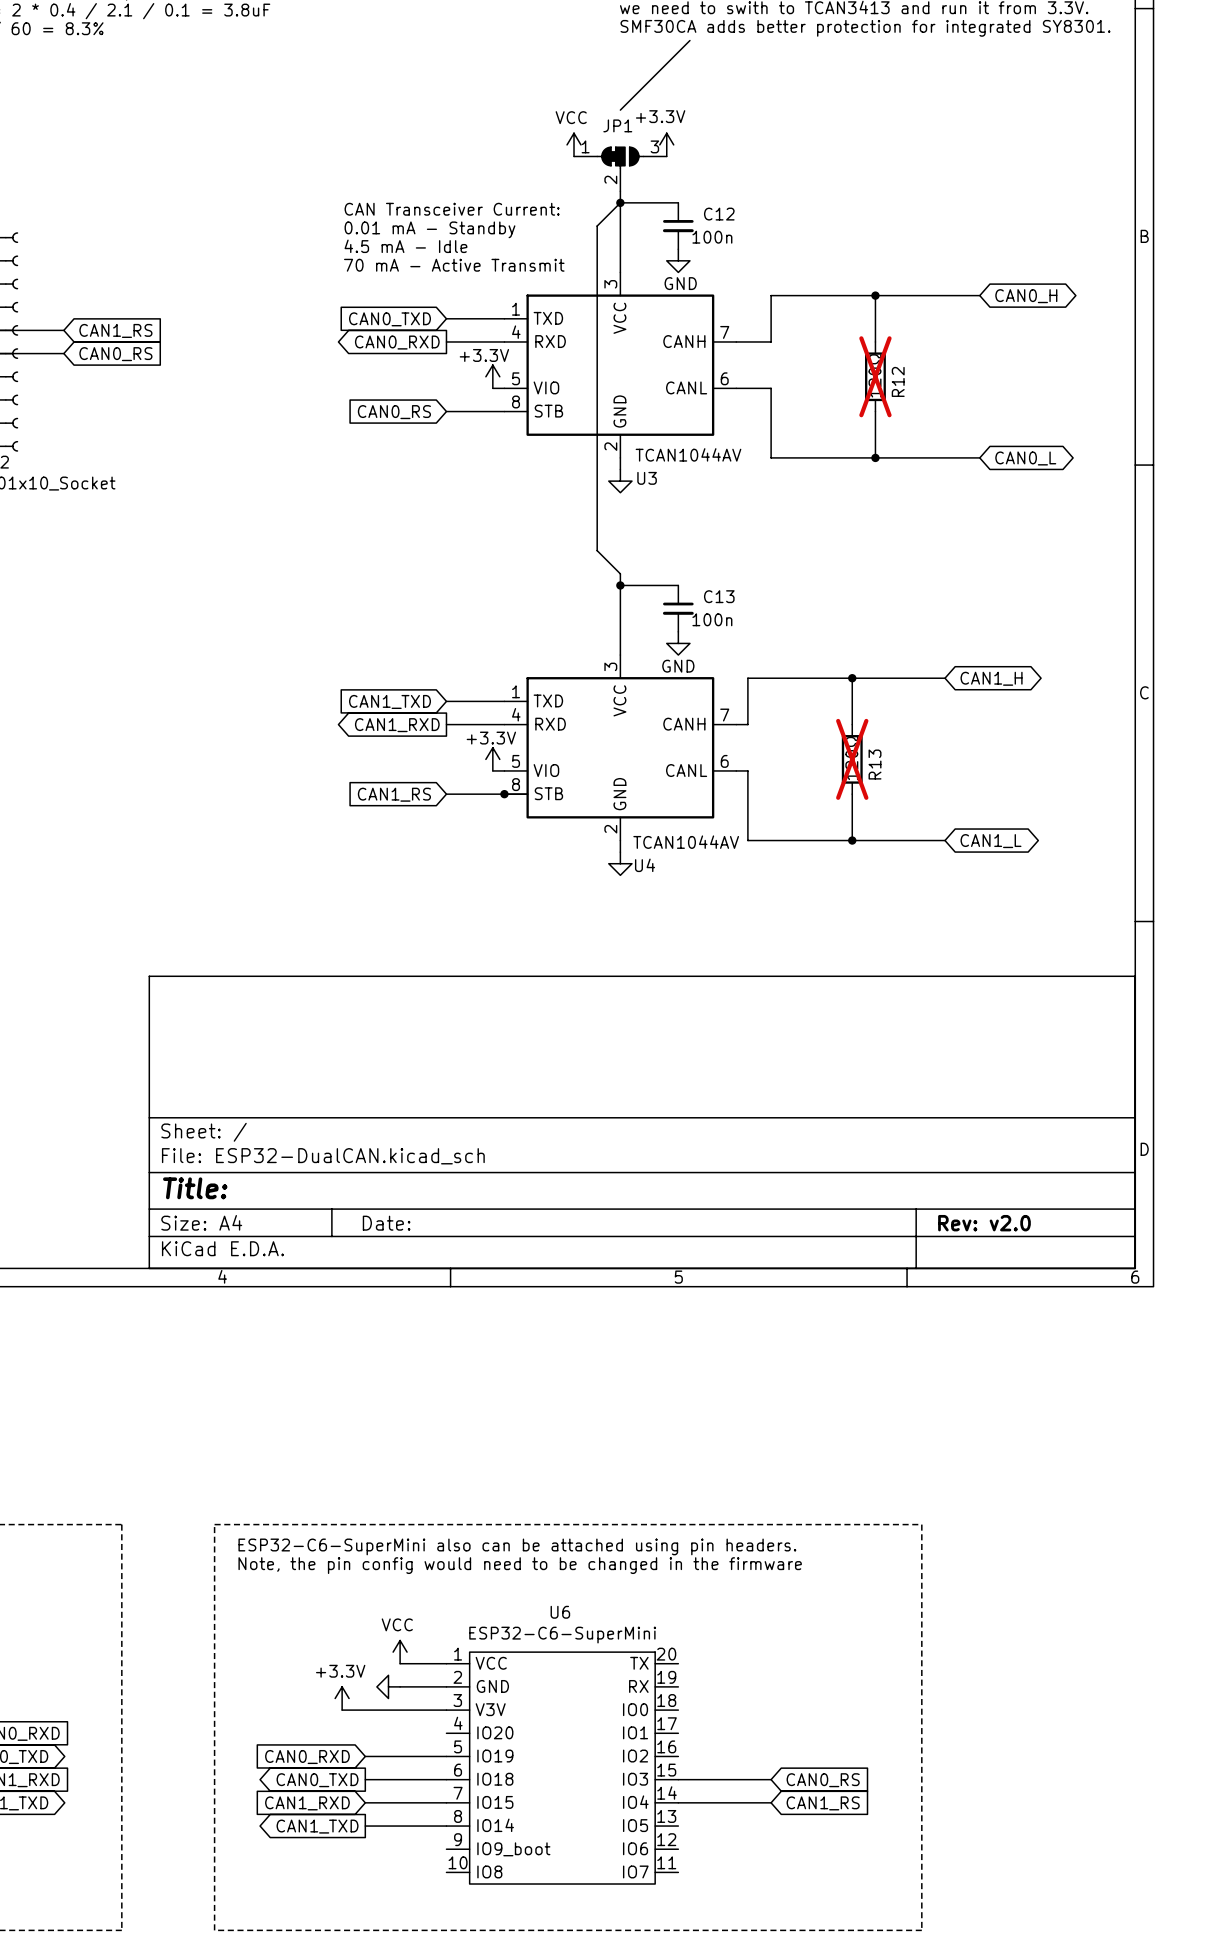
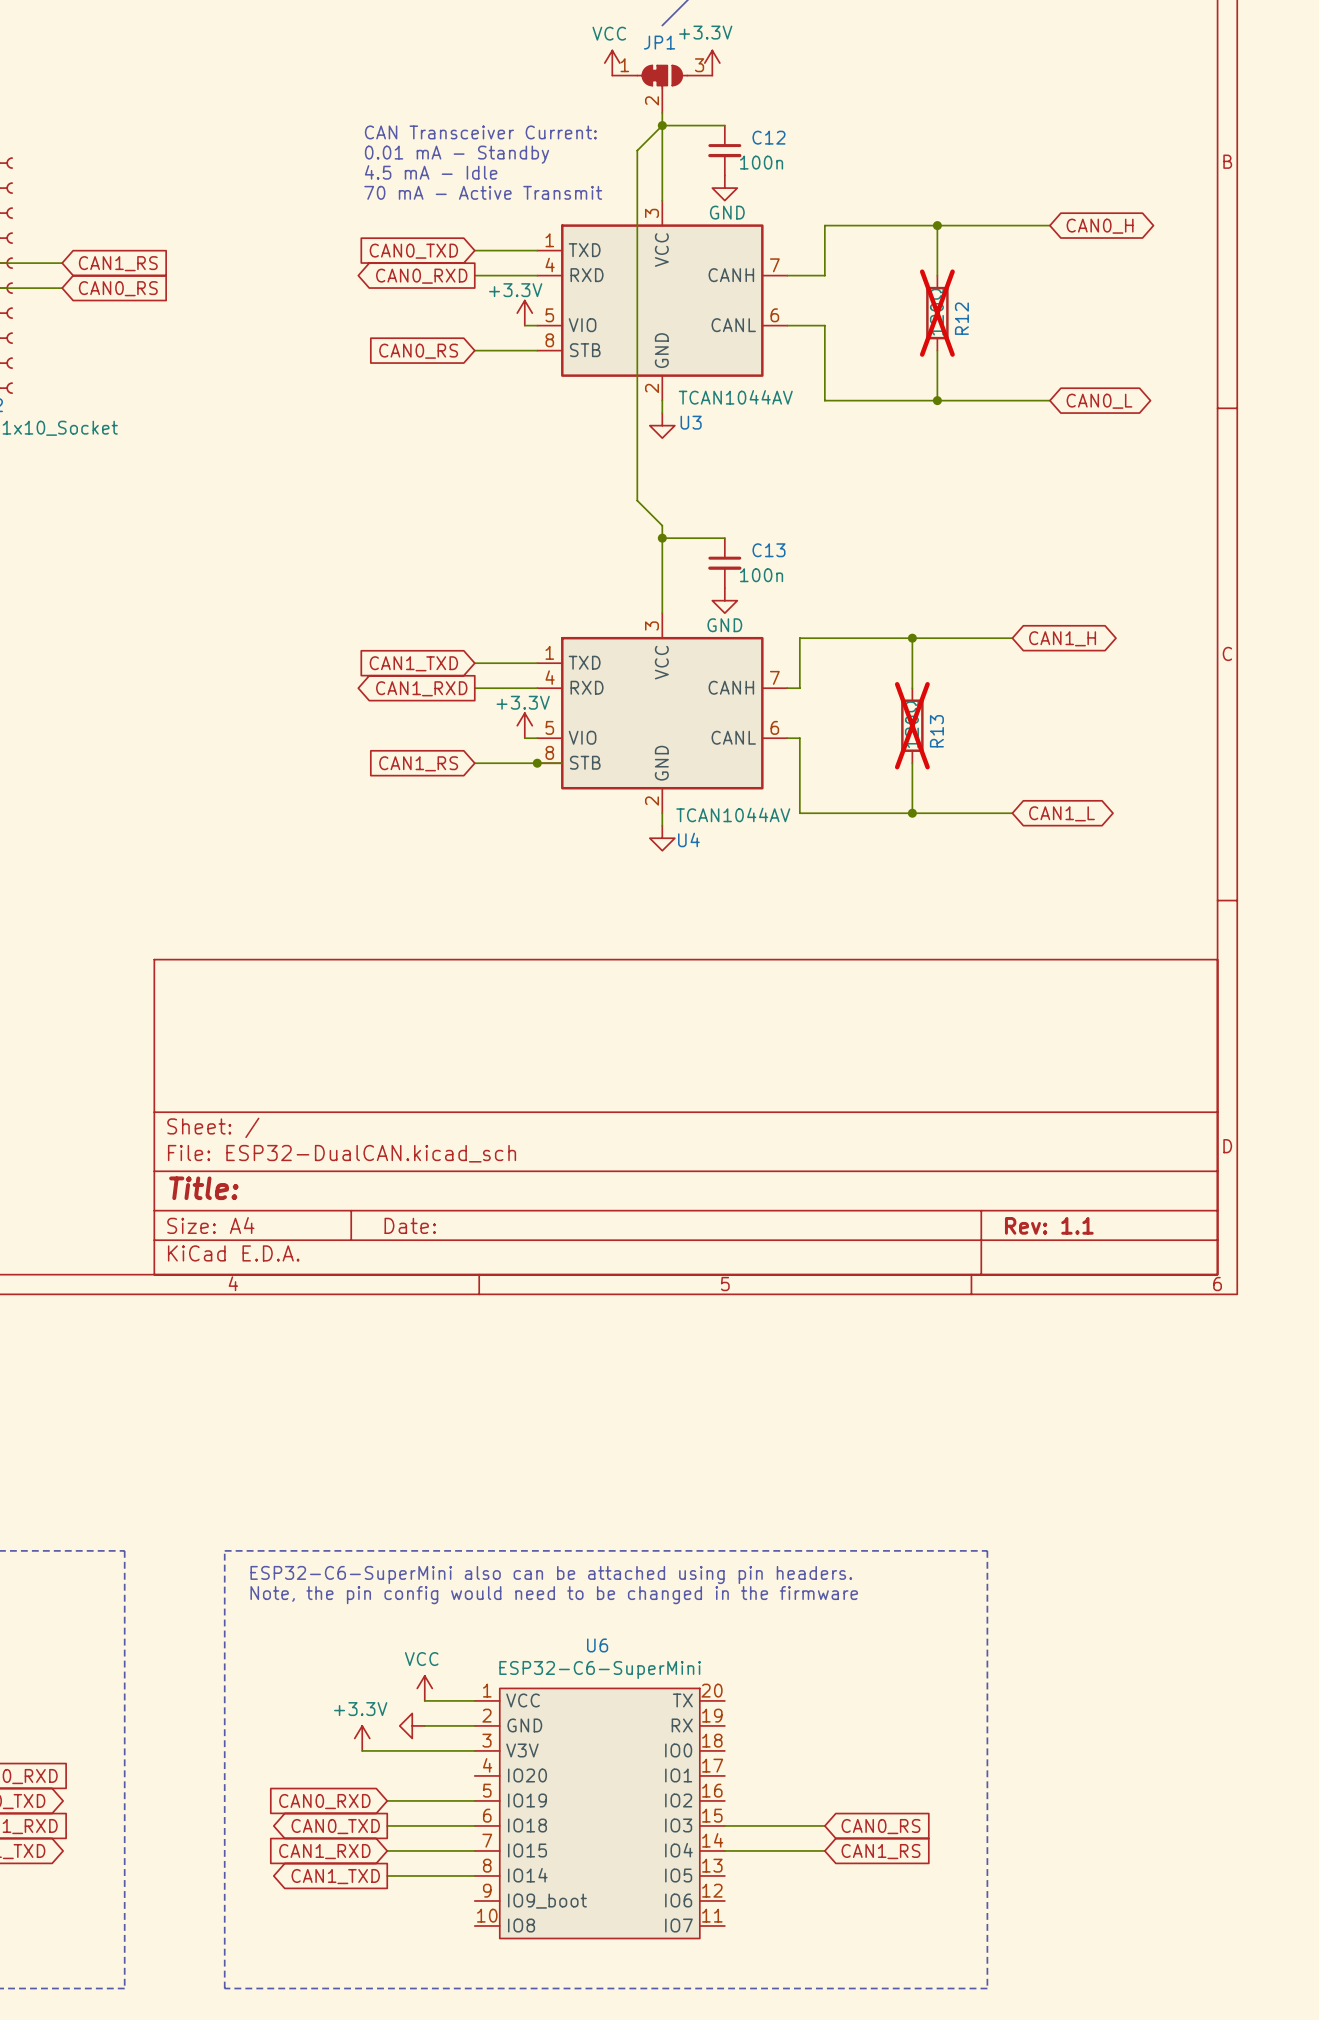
title block: Rev: v2.0 (984, 1223) -> Rev: 1.1 (1049, 1225)

